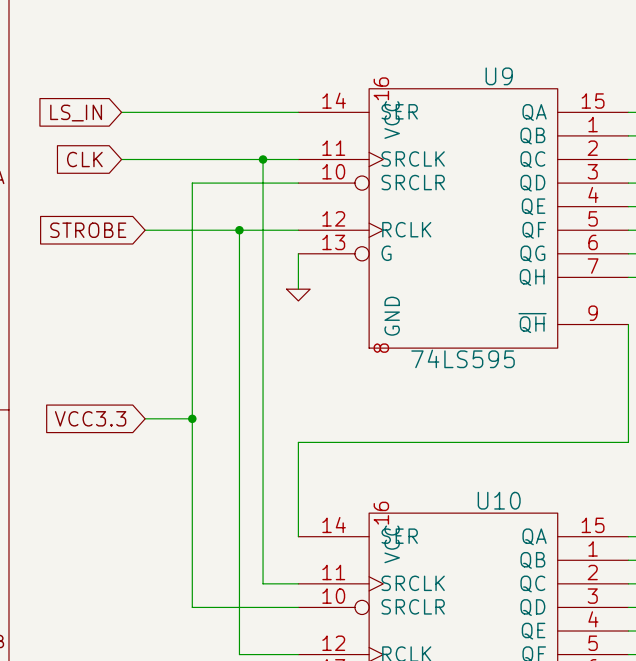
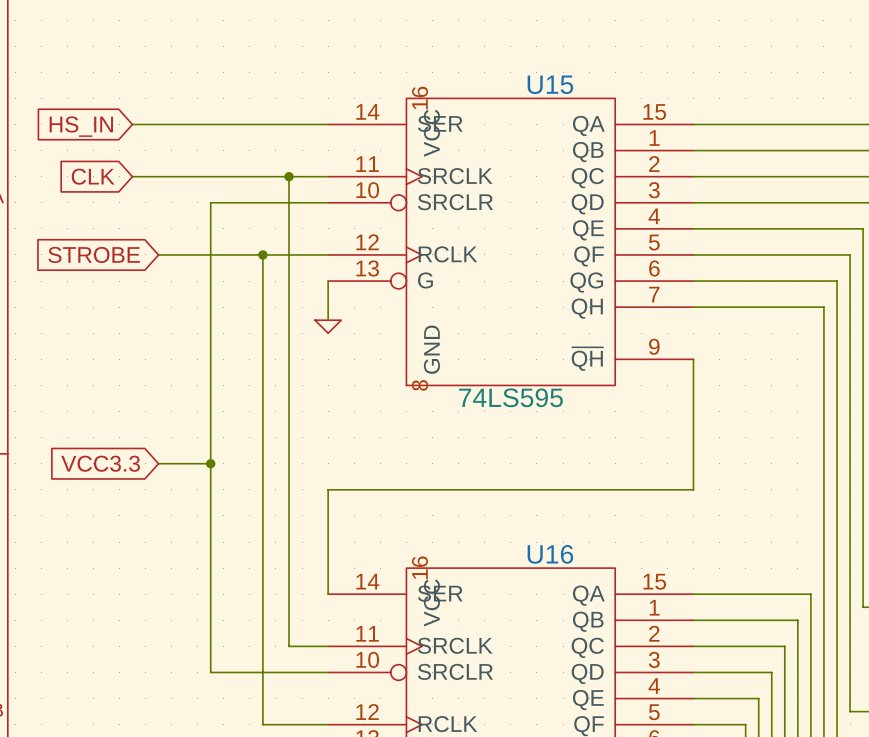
U9 name: U9 (499, 76) -> U15 (550, 84)
global label: LS_IN (76, 113) -> HS_IN (81, 126)
U10 name: U10 (499, 500) -> U16 (550, 554)

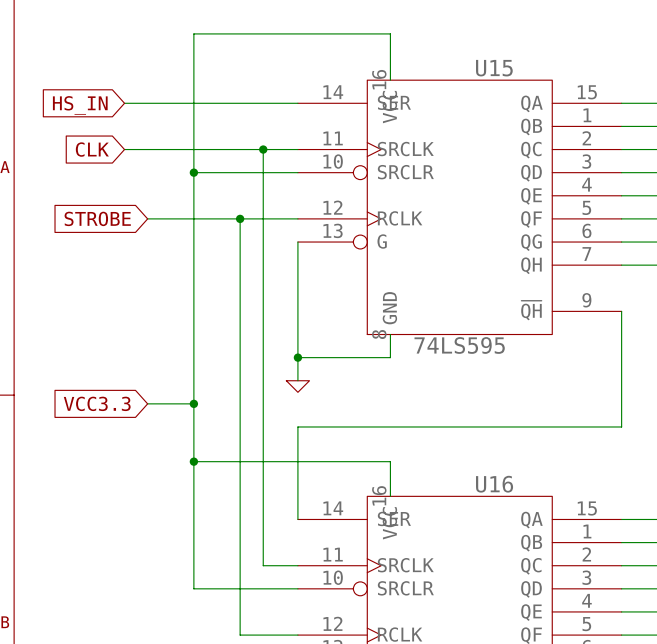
wire: none -> (390, 80) (390, 33) (193, 33) (193, 172)
junction: none -> (193, 172)
wire: none -> (297, 276) (297, 380)
power symbol position: (328, 326) -> (297, 386)
wire: none -> (390, 334) (390, 357) (297, 357)
junction: none -> (297, 357)
wire: none -> (193, 461) (390, 461) (390, 496)
junction: none -> (193, 461)

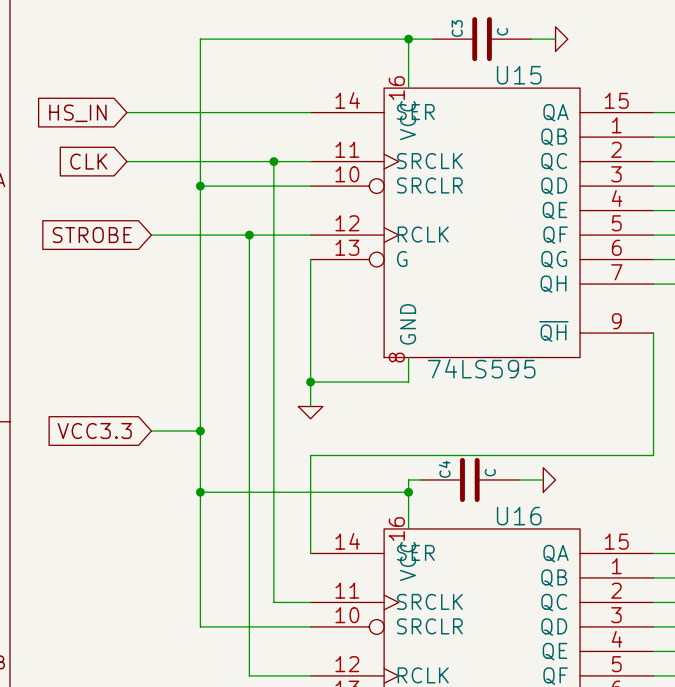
wire: none -> (408, 39) (433, 39)
junction: none -> (408, 39)
C3: none -> C (482, 39)
wire: none -> (531, 39) (555, 39)
power symbol: none -> (561, 39)
wire: none -> (420, 479) (408, 479) (408, 492)
C4: none -> C (469, 479)
wire: none -> (518, 479) (543, 479)
power symbol: none -> (549, 479)
junction: none -> (408, 492)

